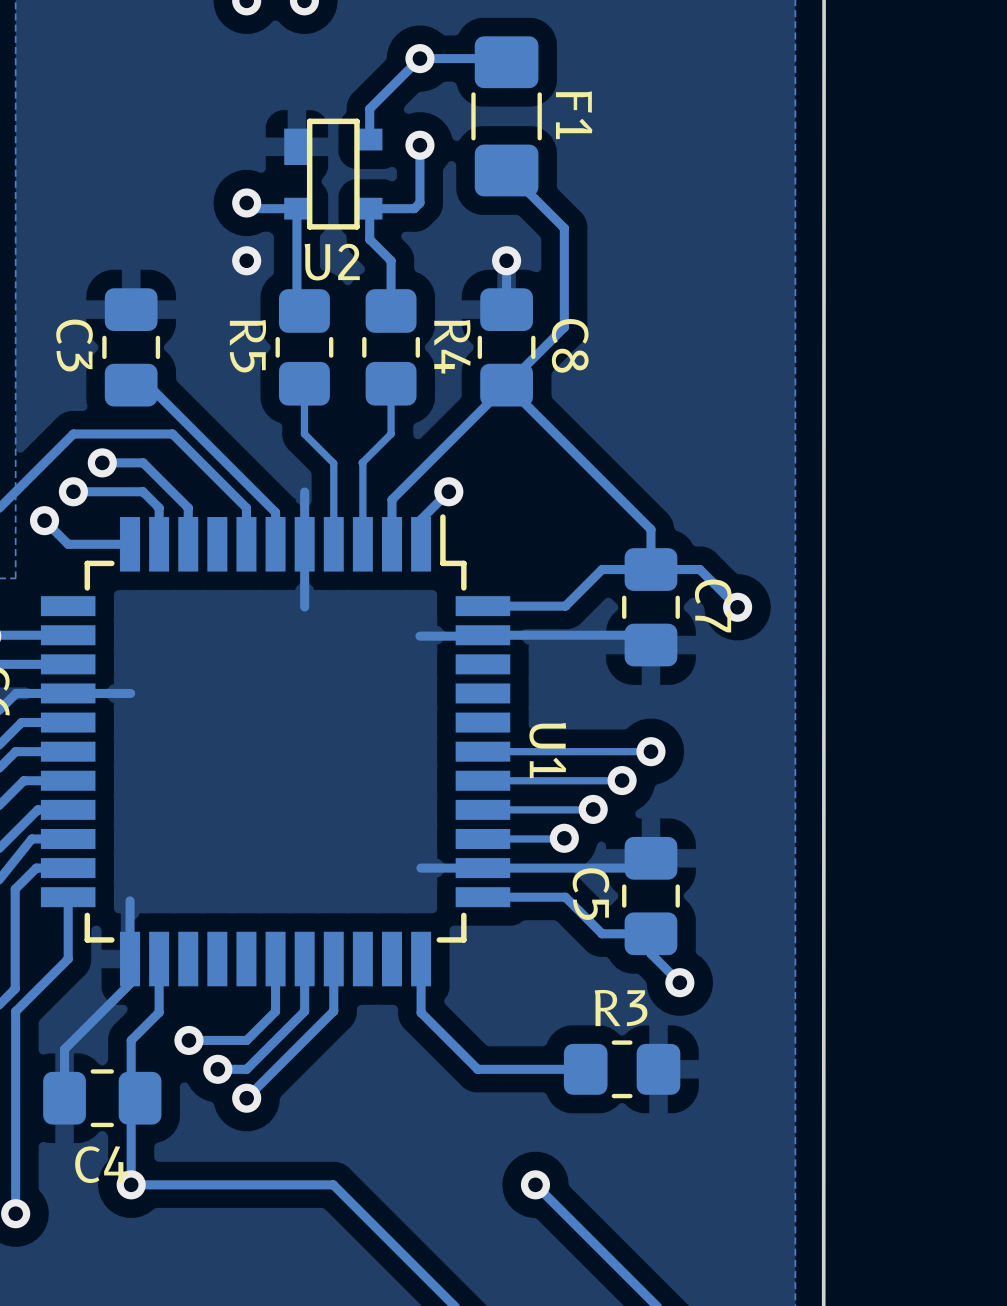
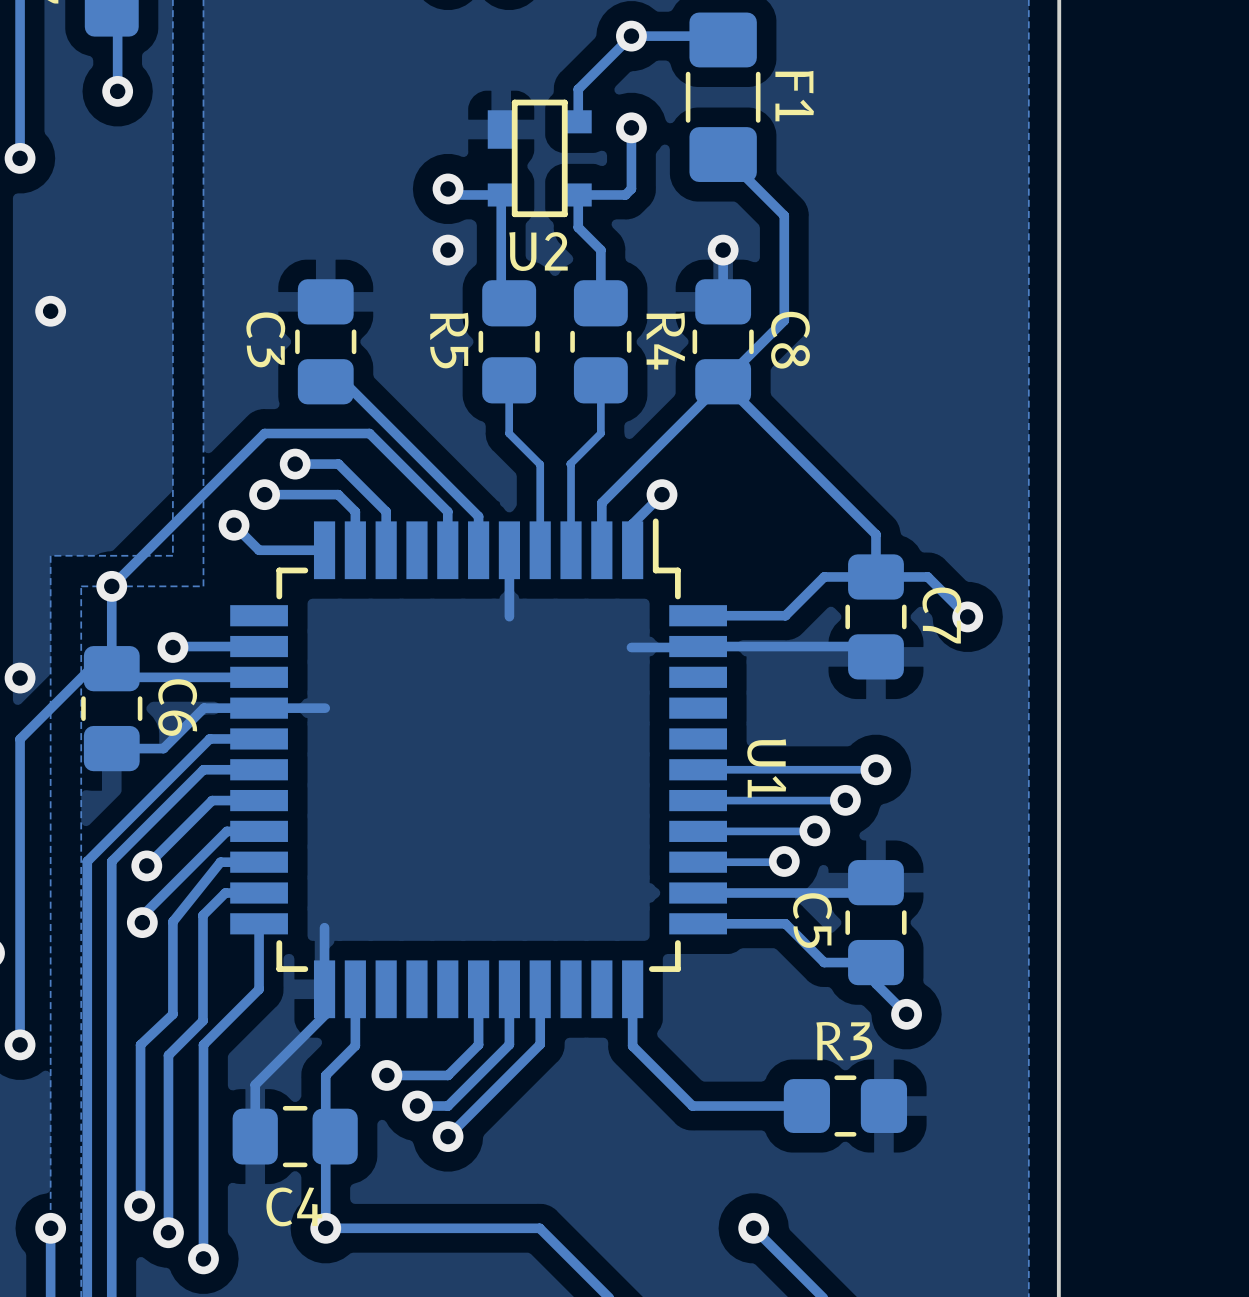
track: (304, 491) (304, 544) -> none
track: (482, 868) (420, 868) -> none

